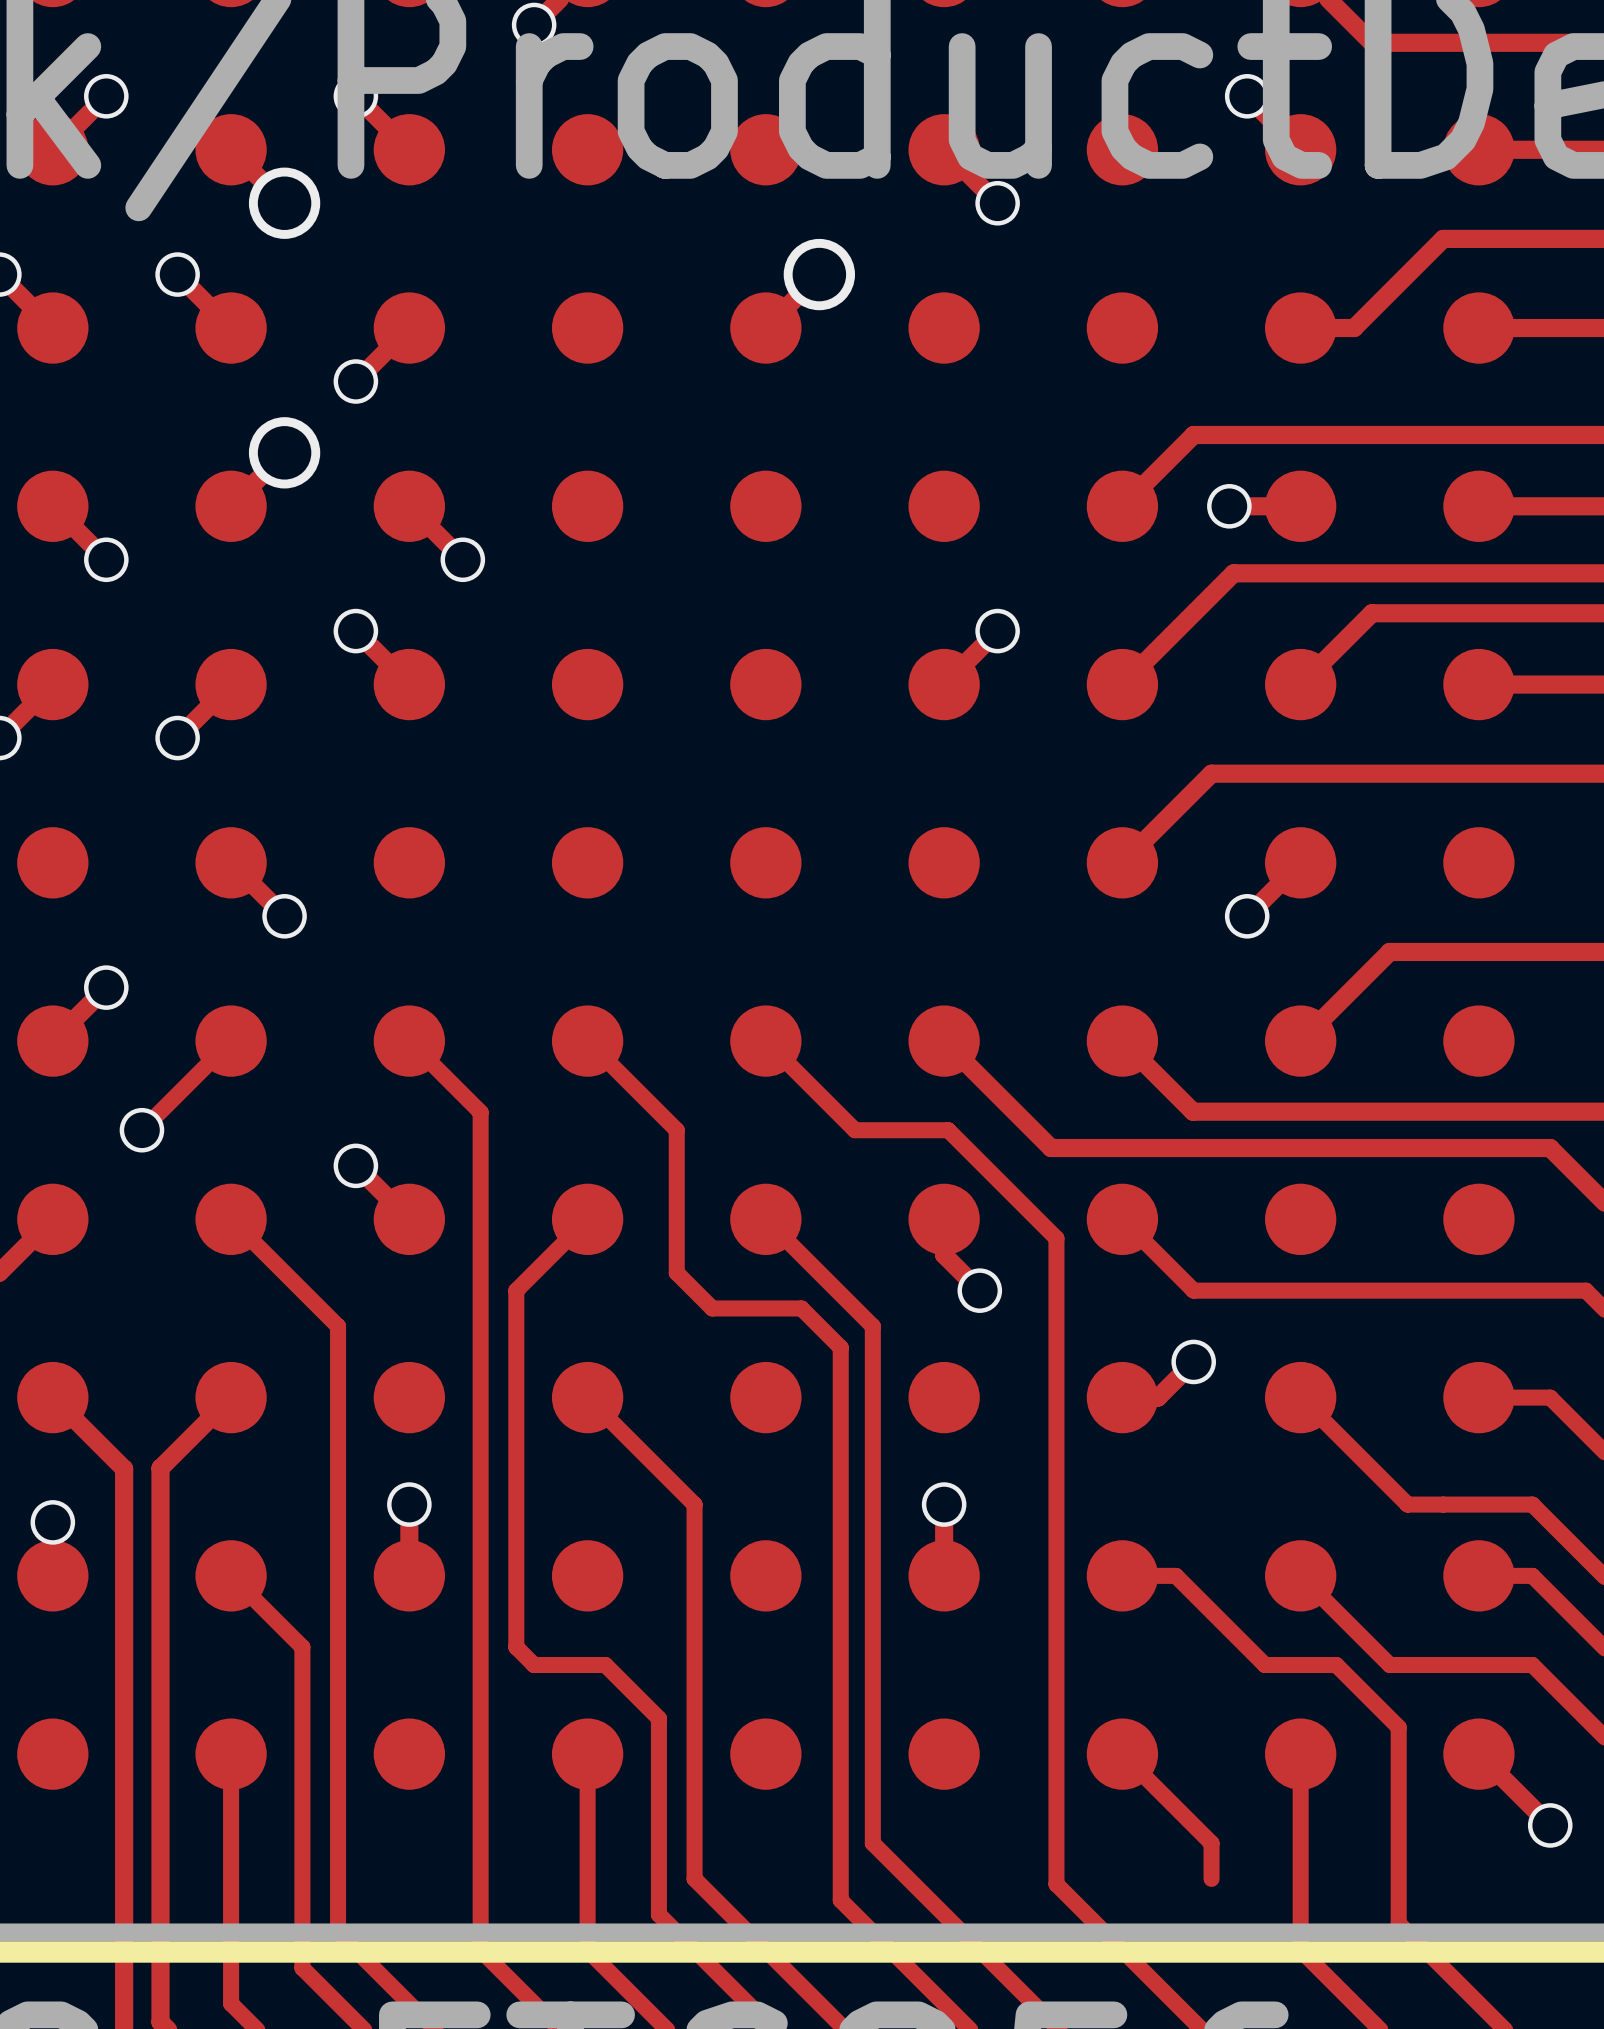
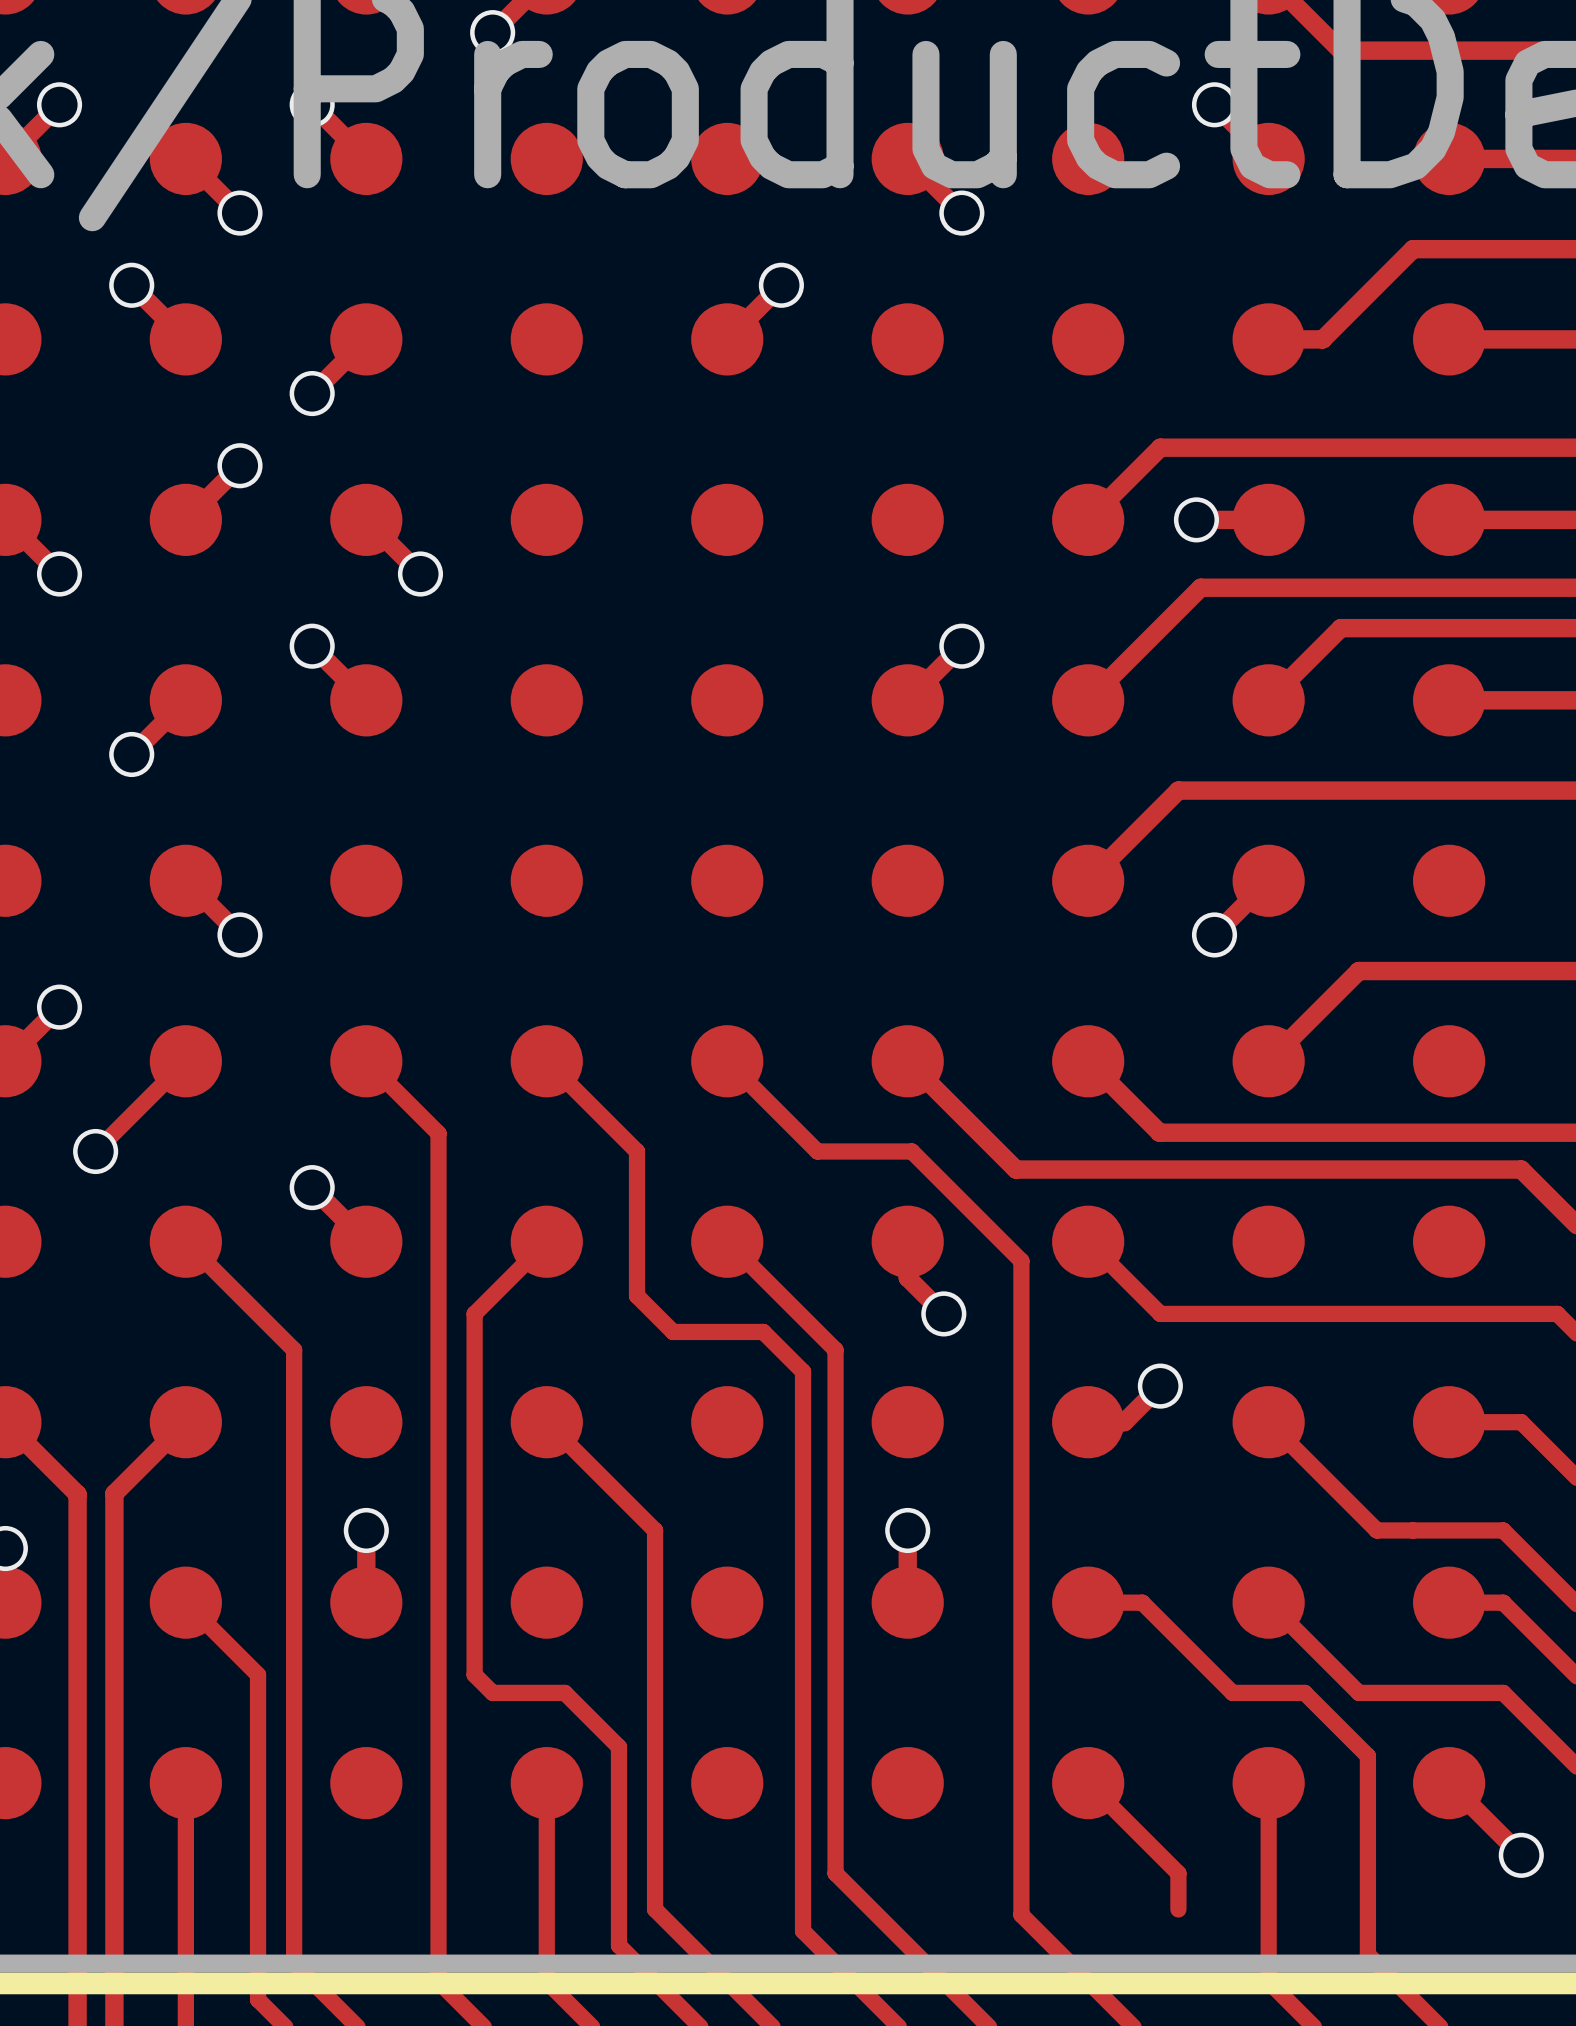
via size: [248, 167, 321, 239] -> [217, 190, 263, 236]
via size: [783, 238, 856, 311] -> [758, 262, 804, 308]
via size: [248, 417, 321, 489] -> [217, 443, 263, 489]

